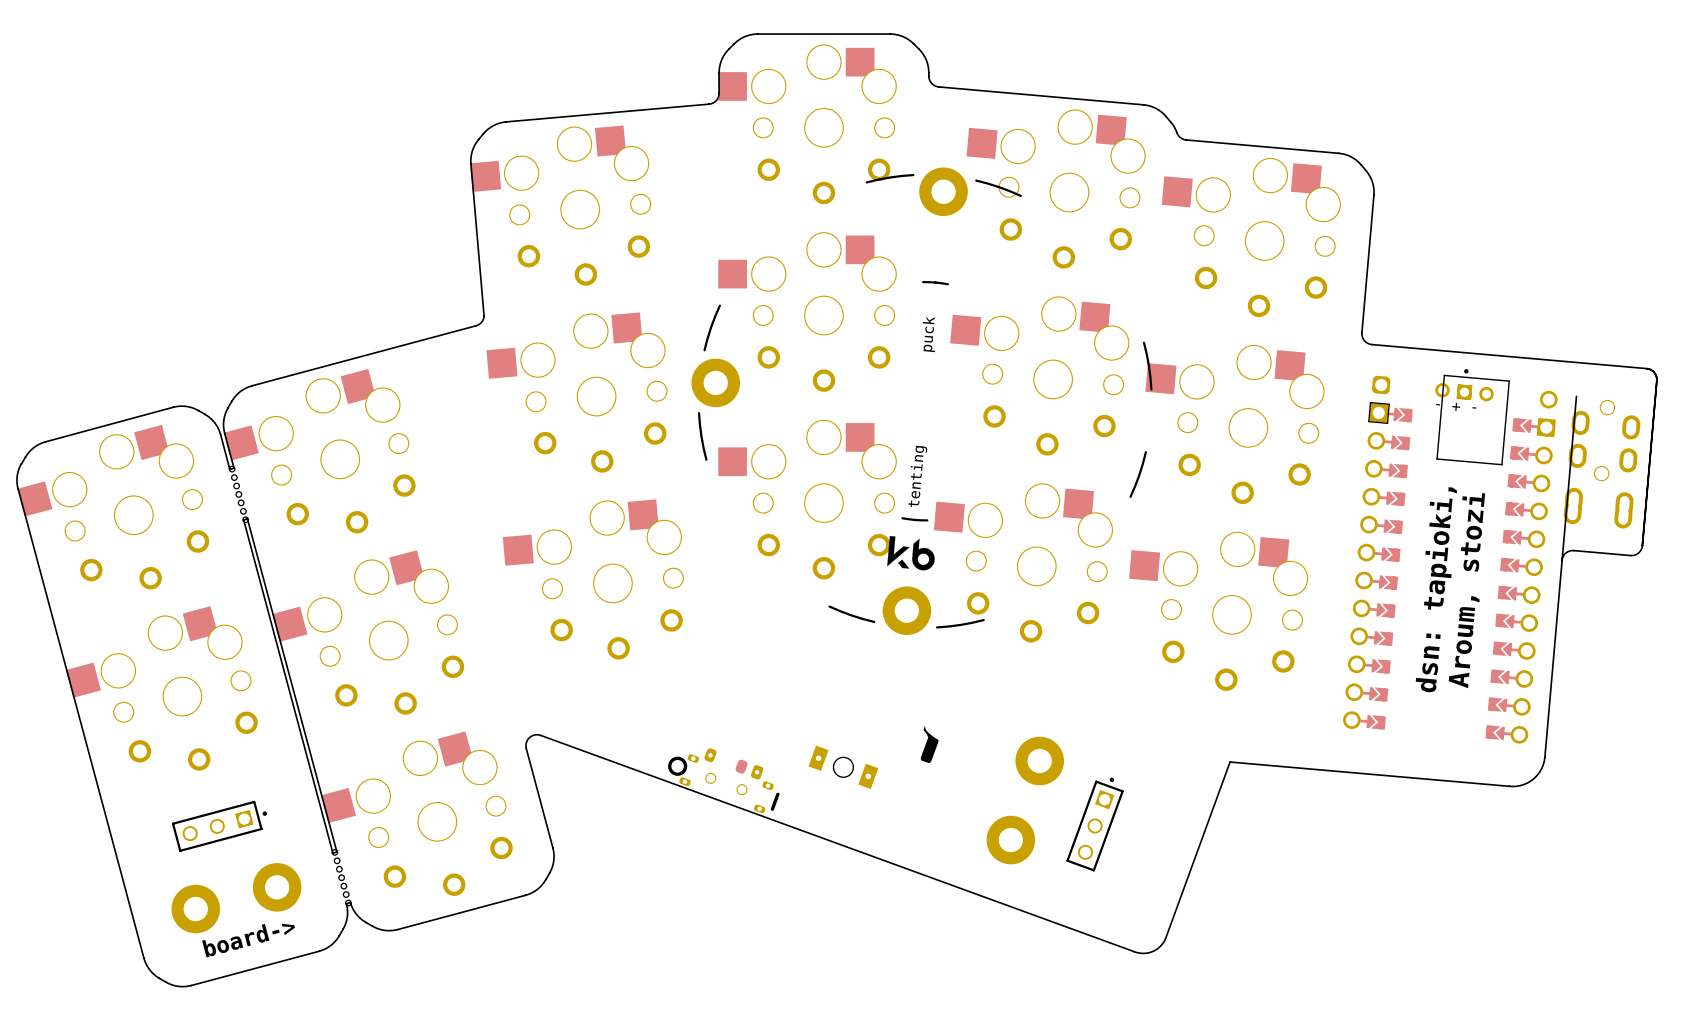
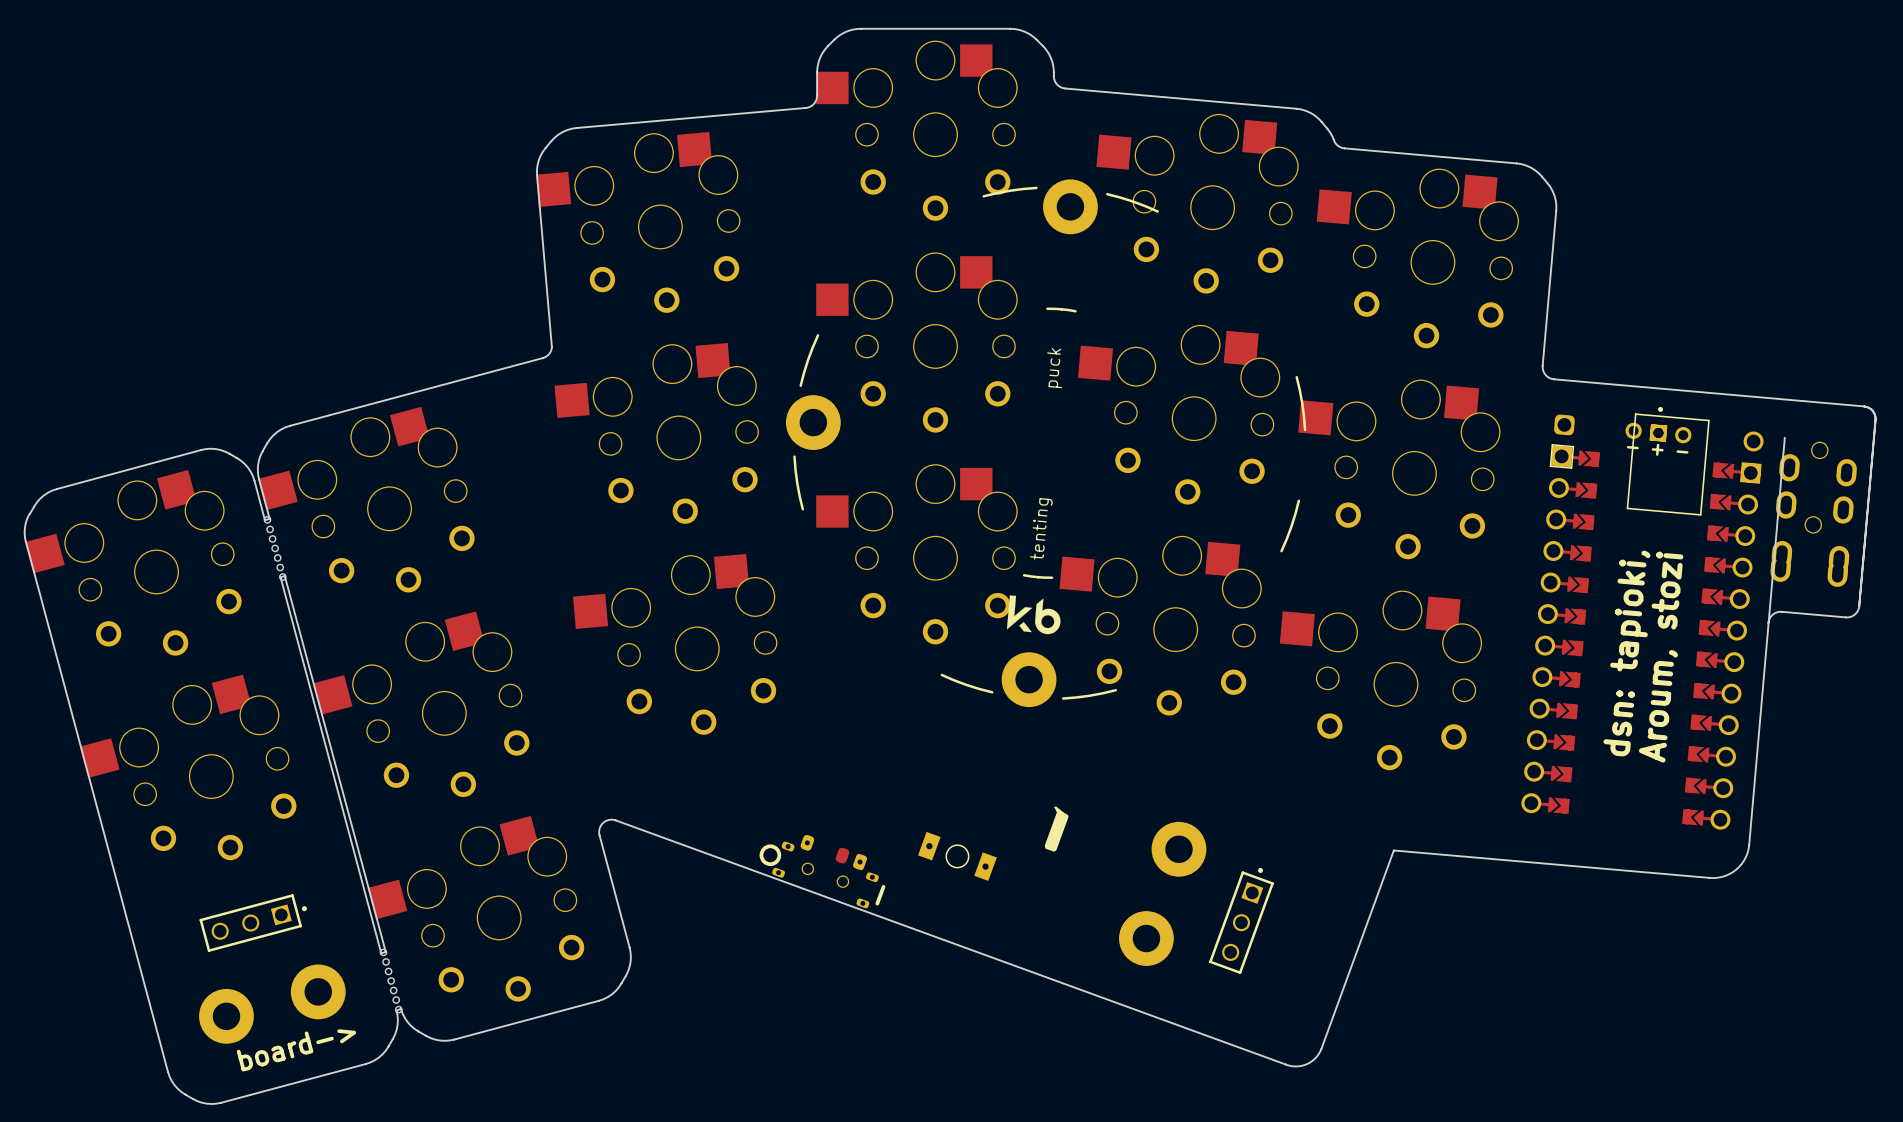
drawing shape: [920, 725, 939, 764] -> [1044, 806, 1069, 852]

